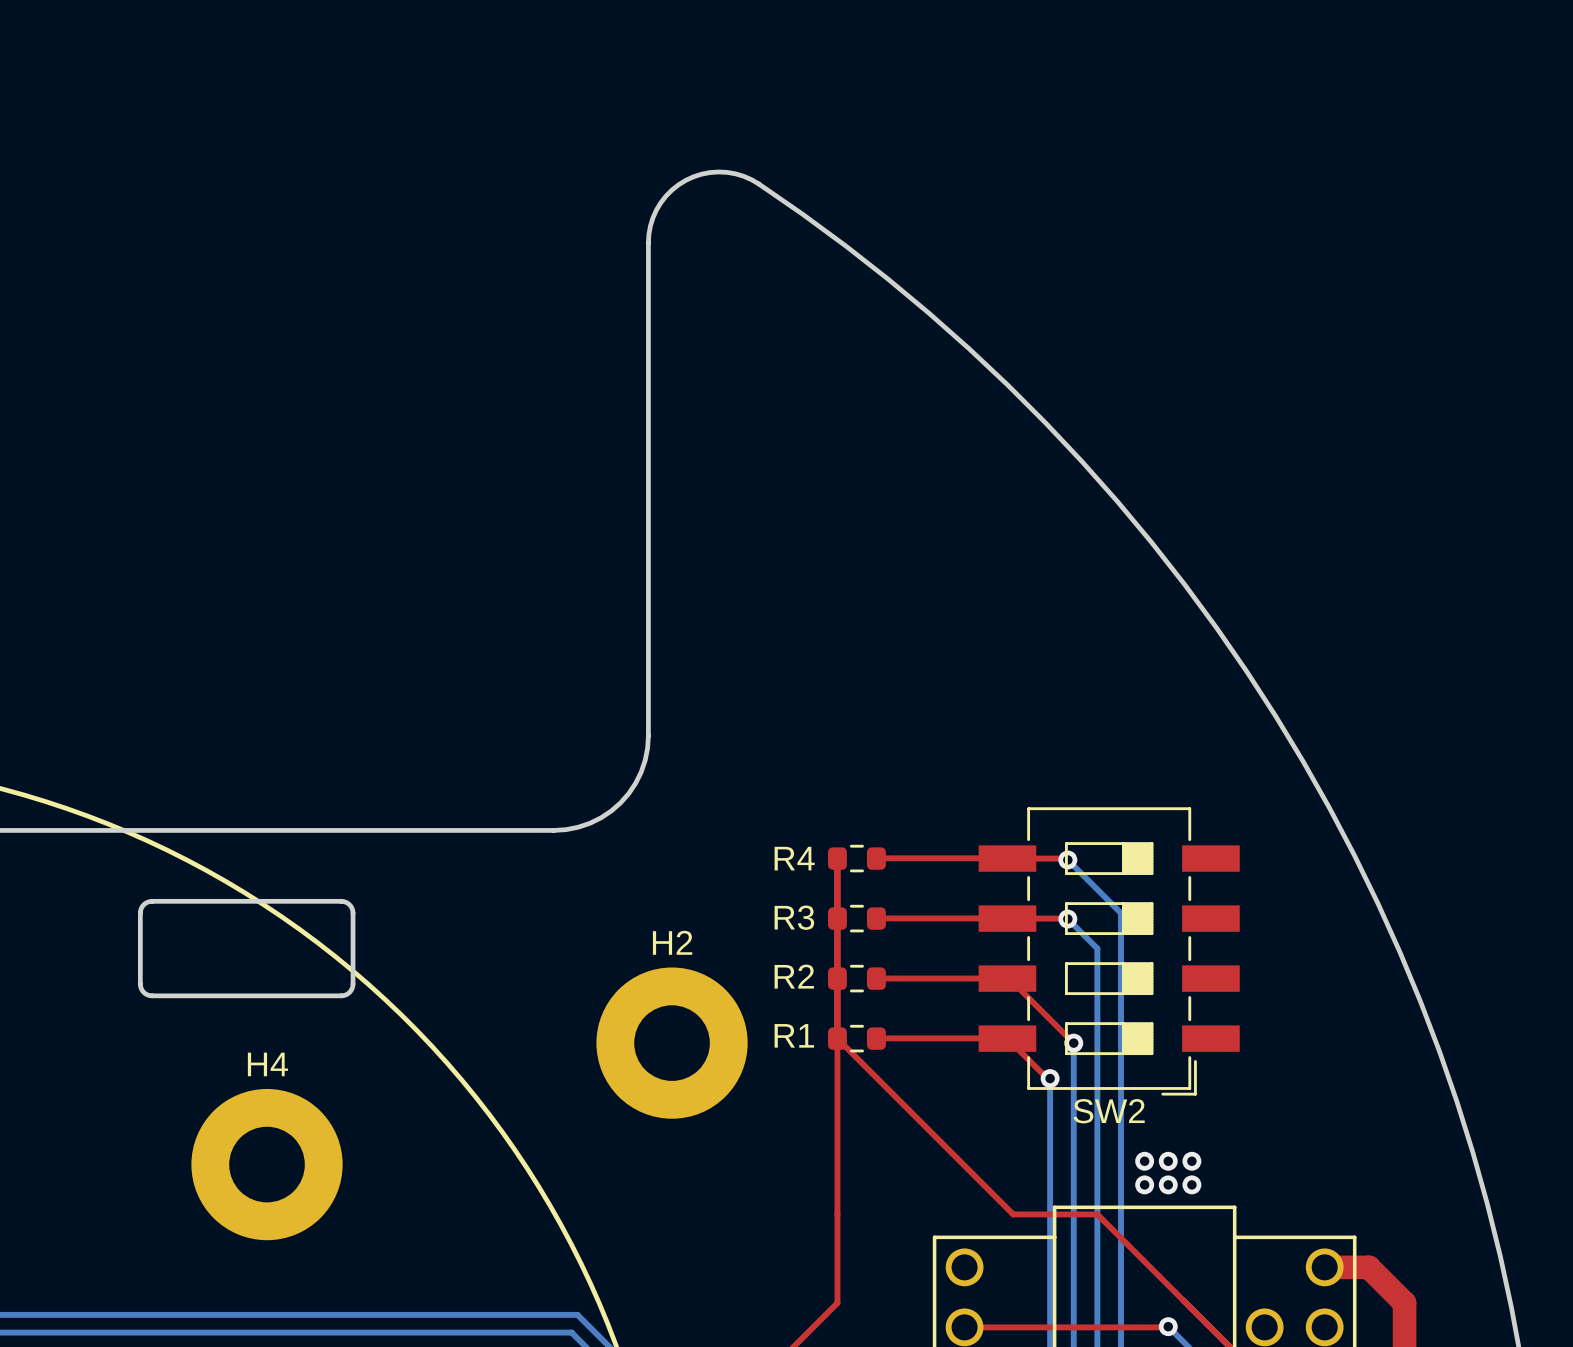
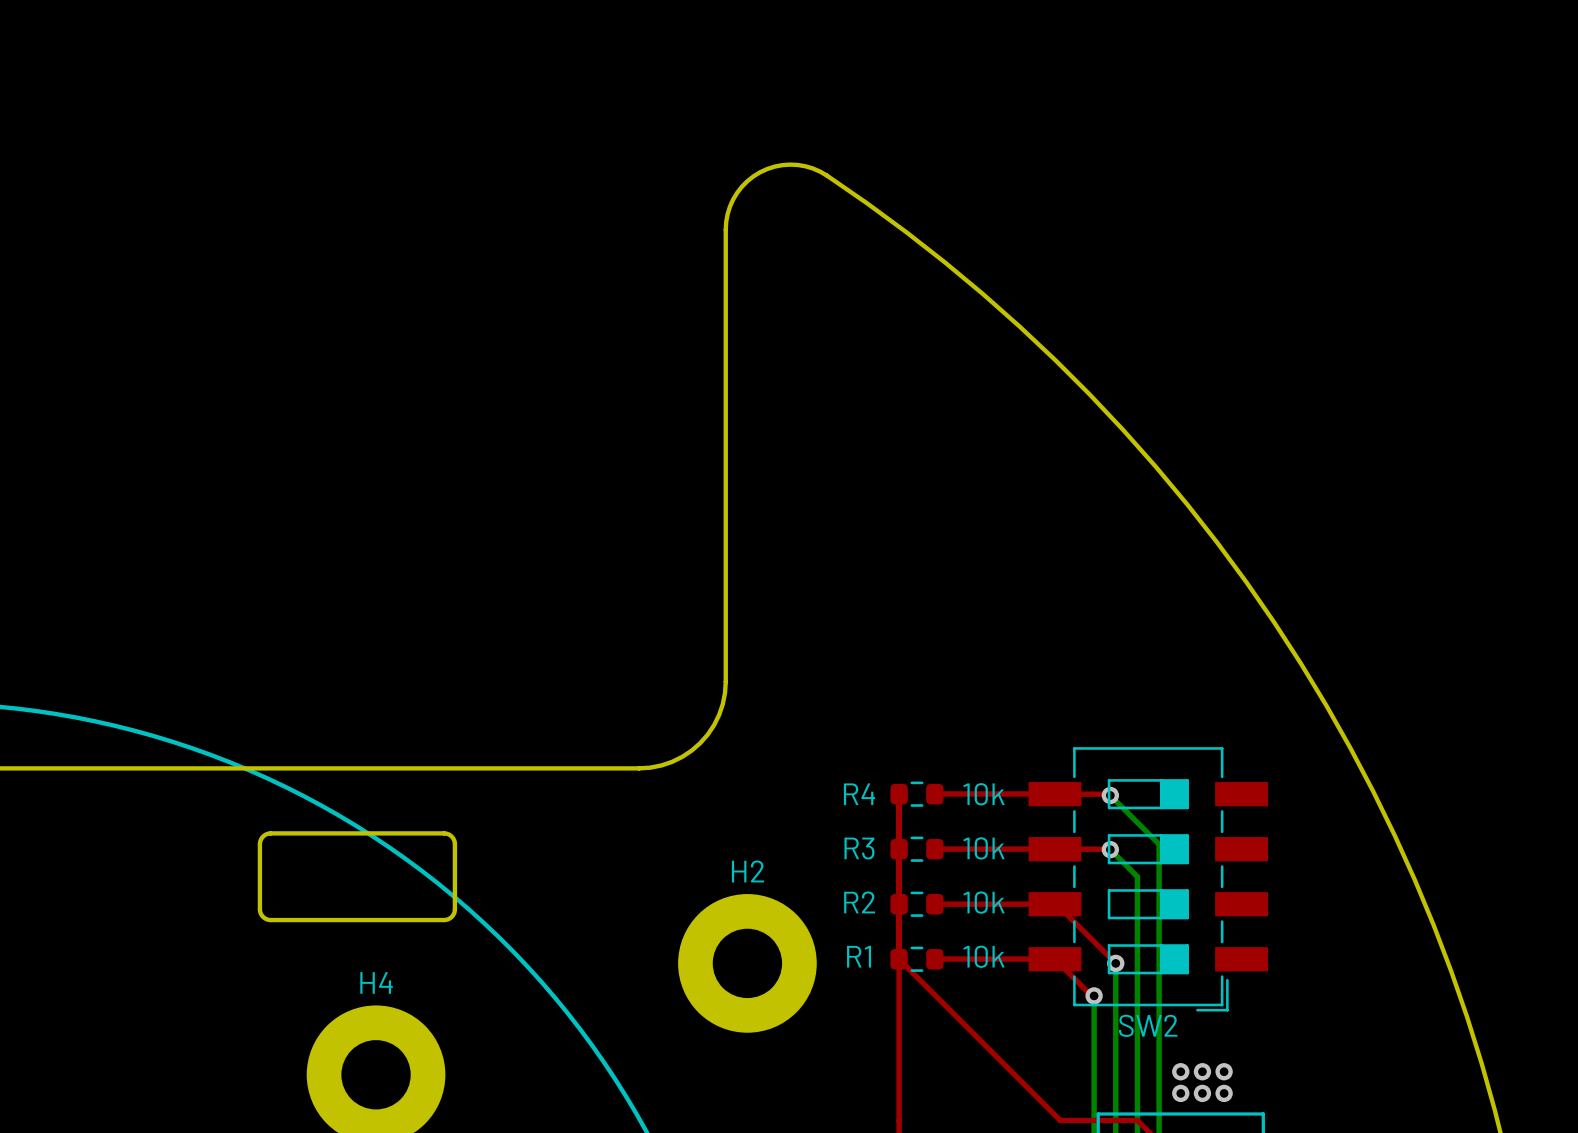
R4 value: none -> 10k (984, 794)
R3 value: none -> 10k (984, 848)
R2 value: none -> 10k (984, 902)
R1 value: none -> 10k (984, 956)

